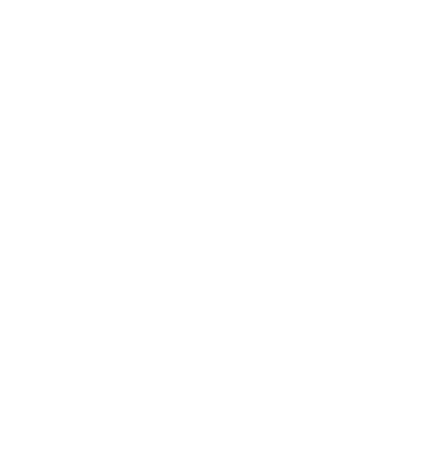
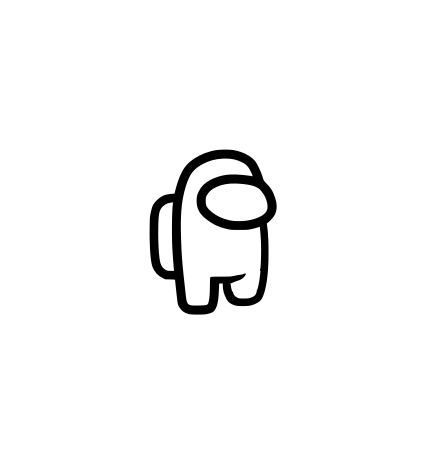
drawing: none -> [149, 149, 277, 315]

